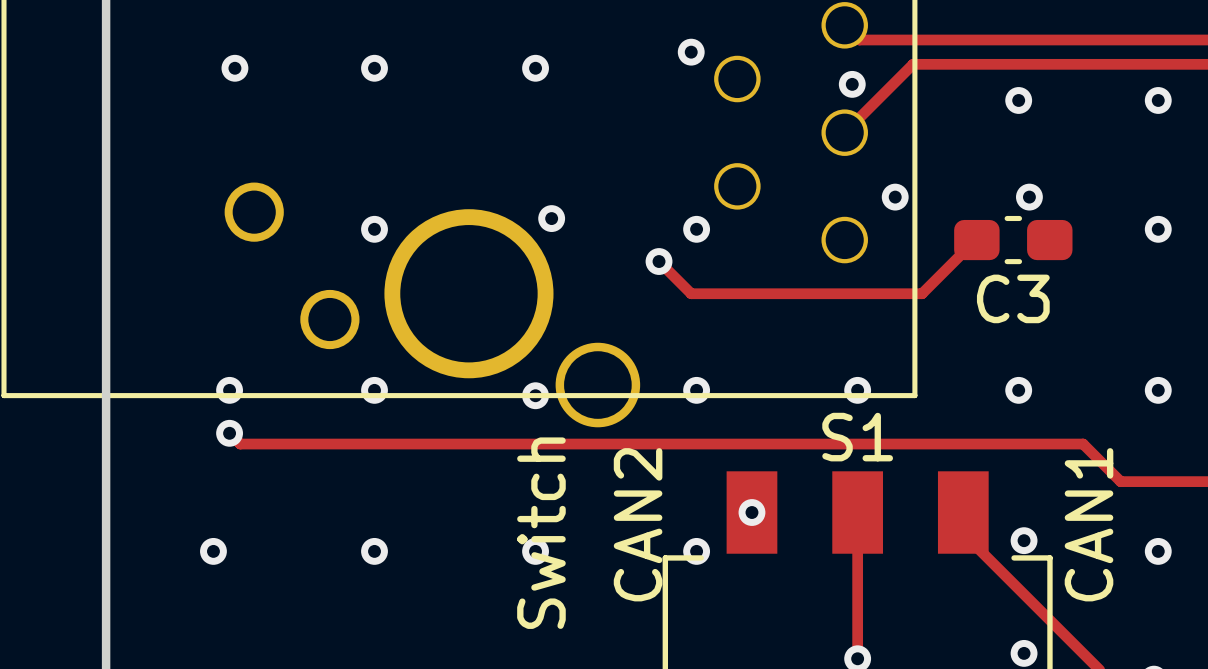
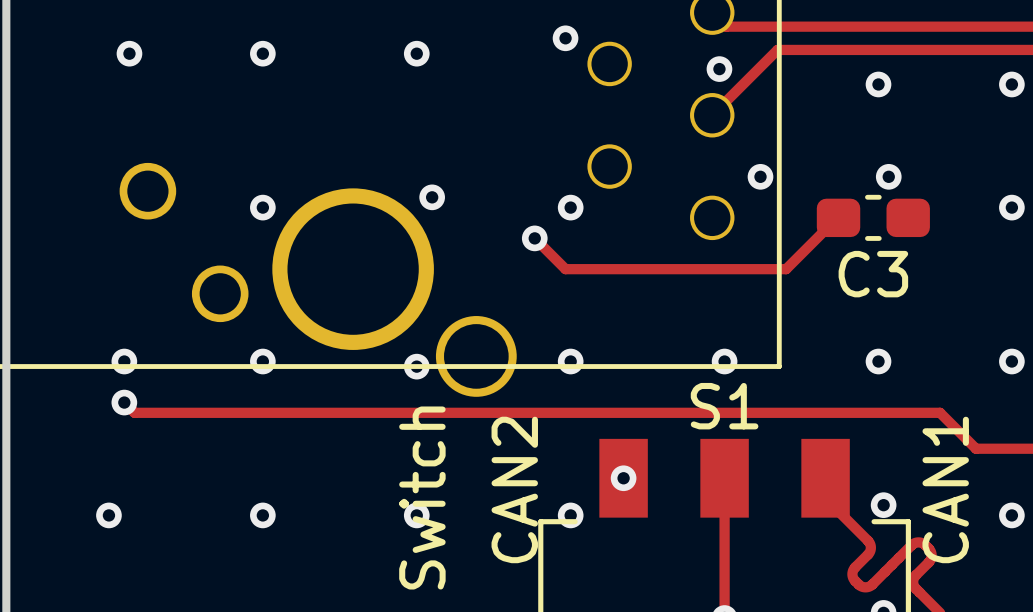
track: (1007, 578) (1057, 628) -> (868, 540) (870, 545) (870, 551) (852, 572) (854, 580) (864, 587) (871, 585) (913, 543) (921, 542) (928, 548) (931, 558) (914, 577) (913, 584) (916, 588)

